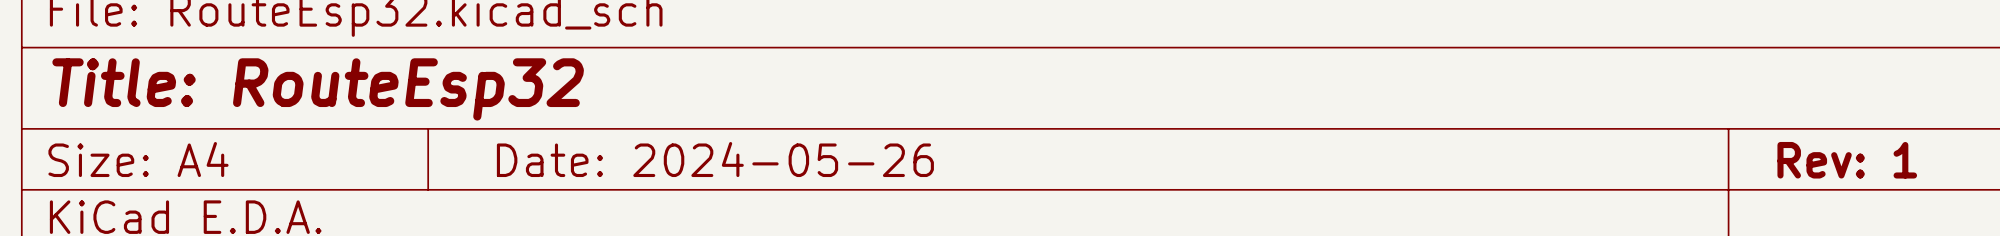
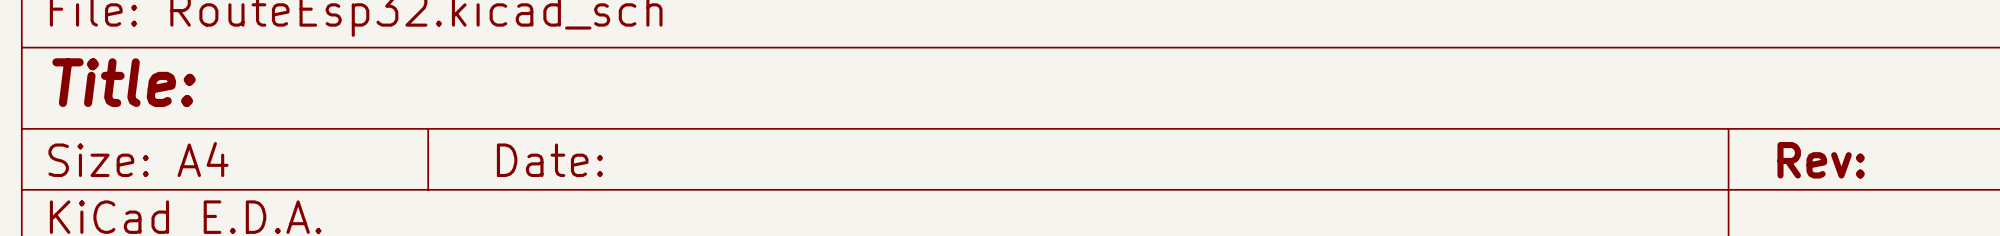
title block: Title: RouteEsp32 (318, 89) -> Title: (124, 82)
title block: Date: 2024-05-26 (715, 159) -> Date: (549, 160)
title block: Rev: 1 (1847, 160) -> Rev: (1821, 160)

